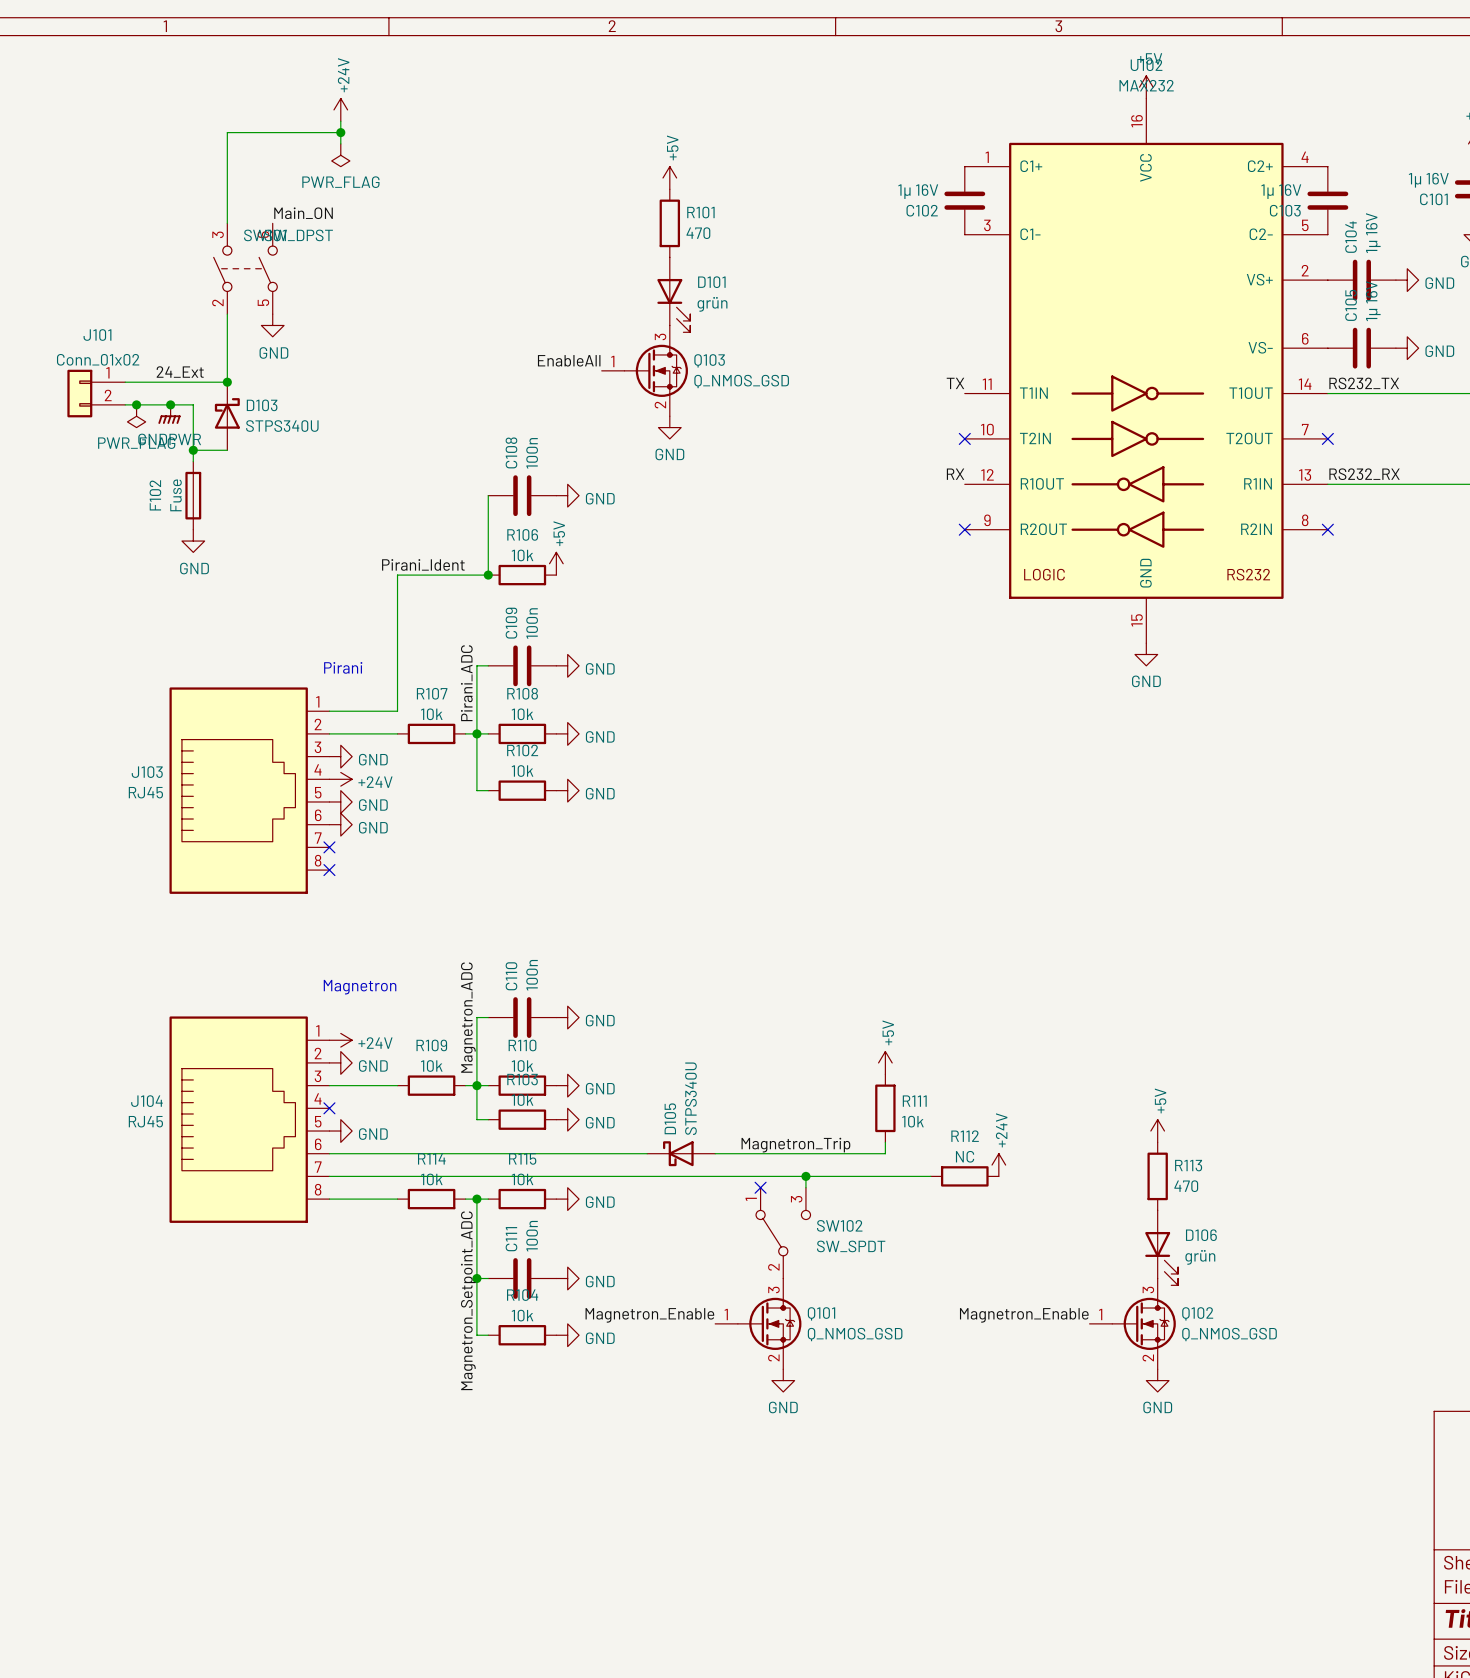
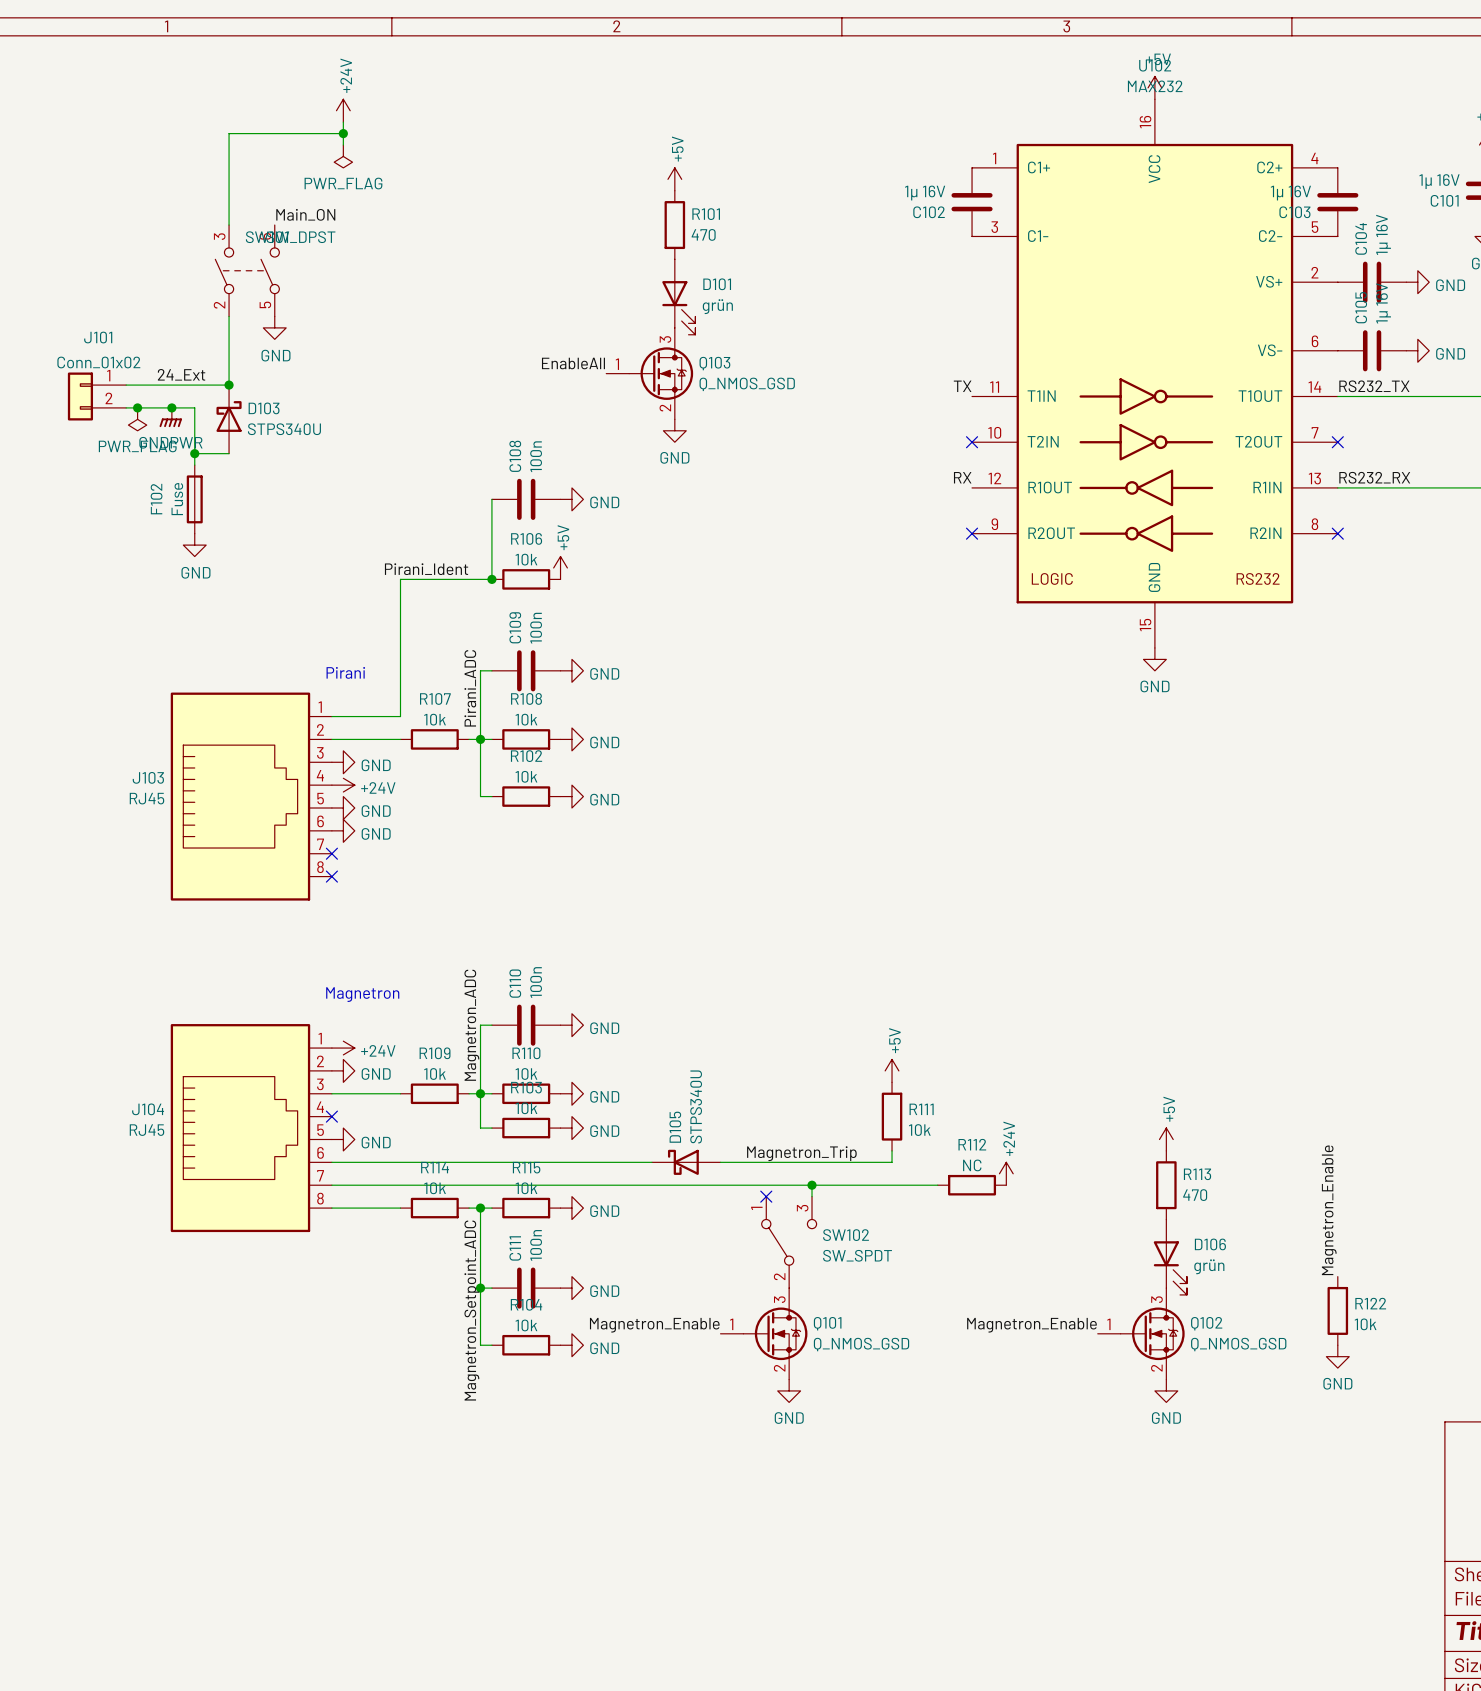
label: none -> Magnetron_Enable (1329, 1210)
R122: none -> 10k (1337, 1310)
power symbol: none -> GND (1337, 1356)

